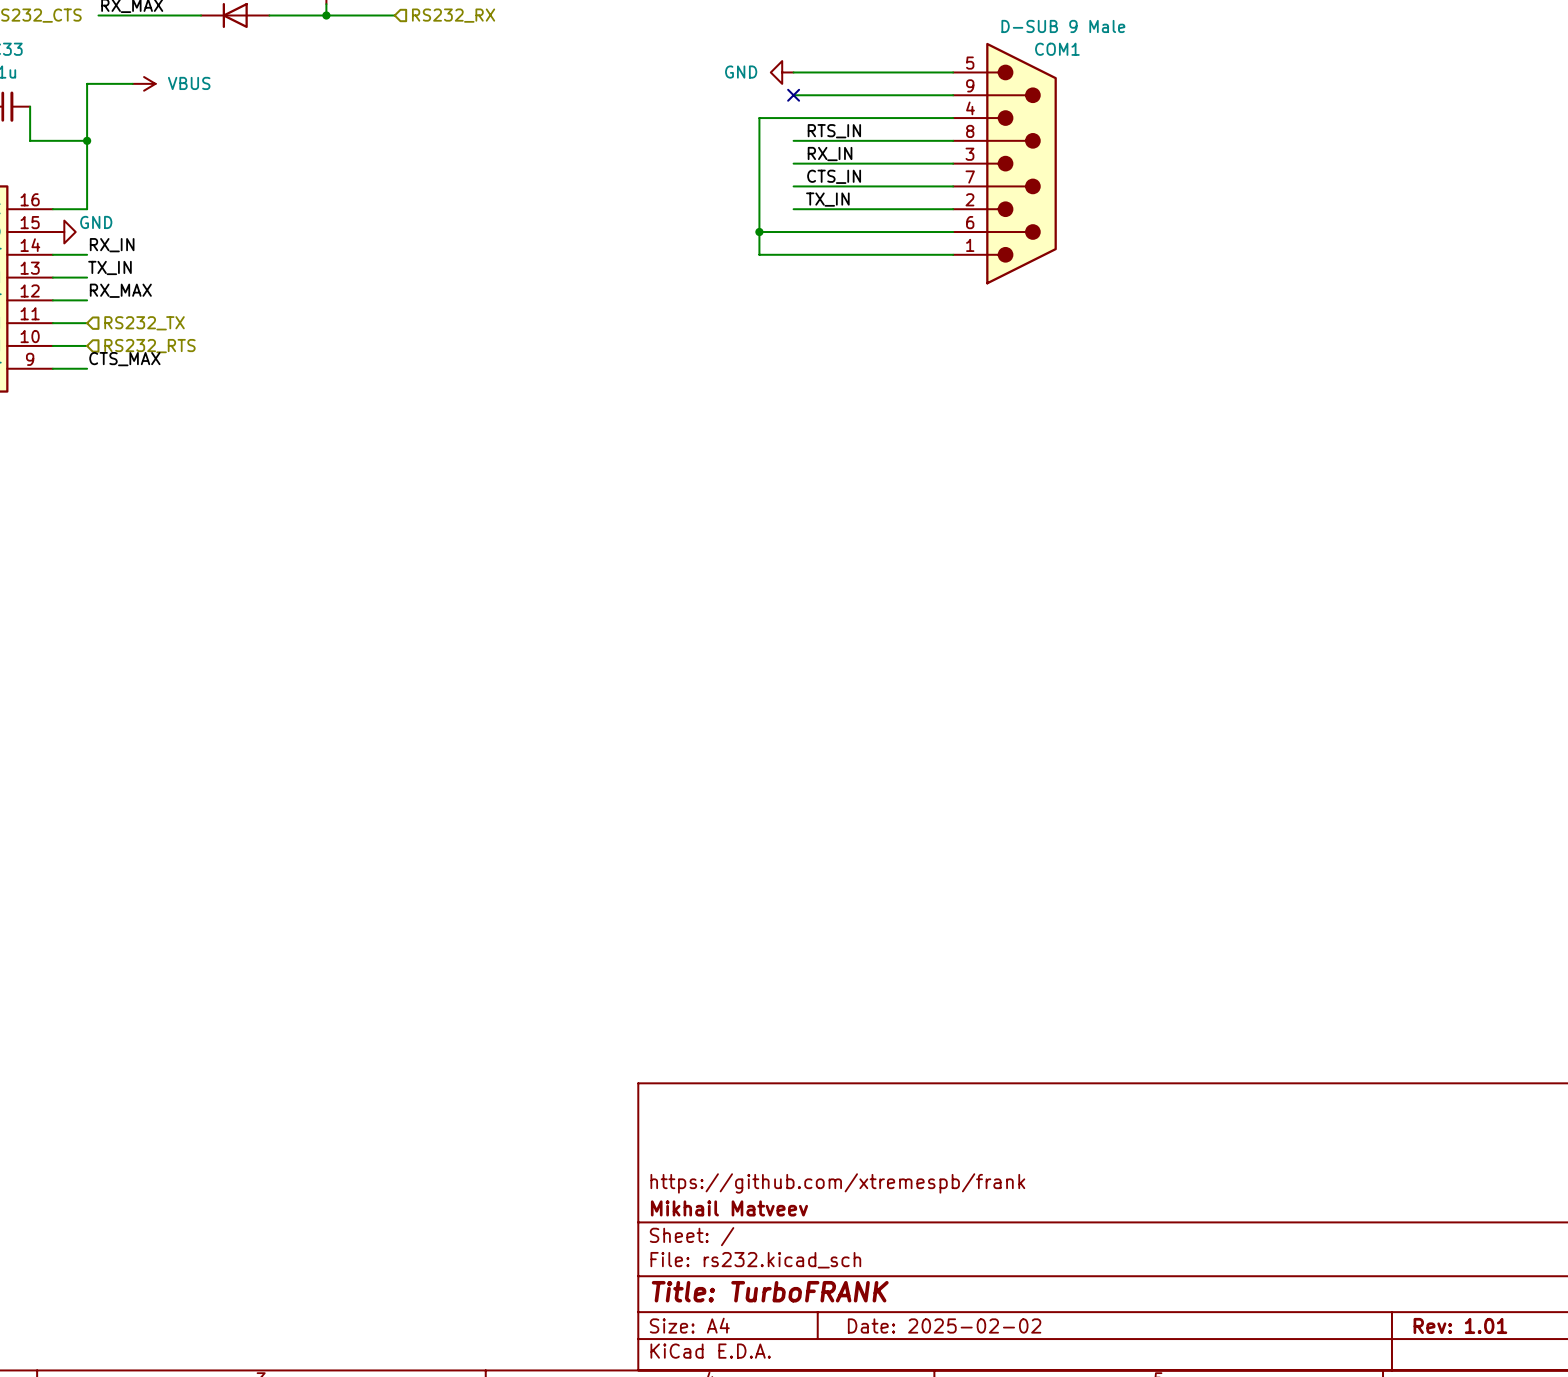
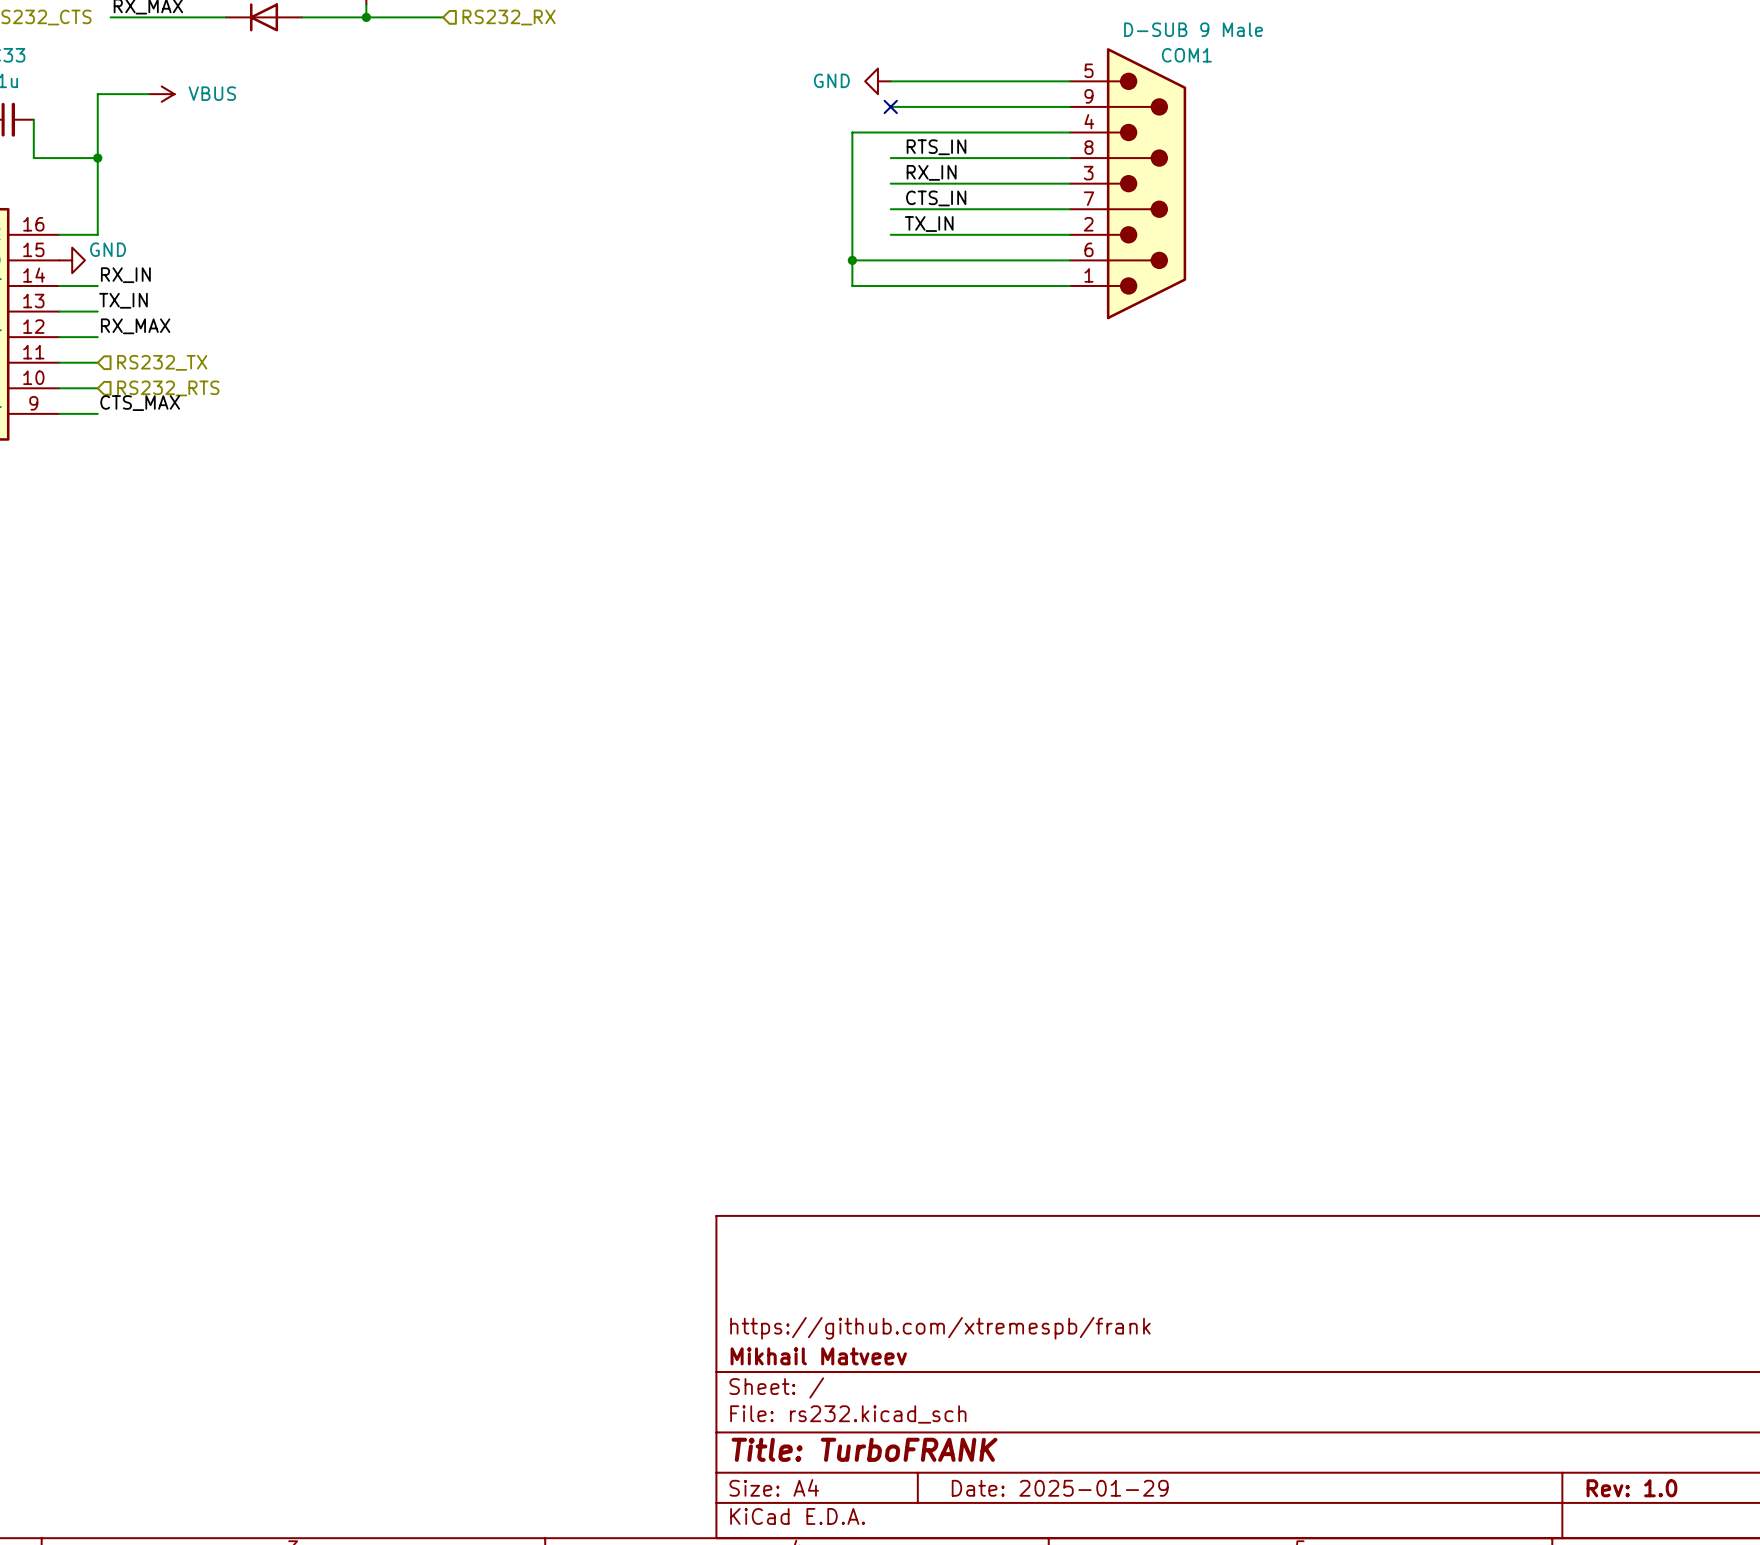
title block: Date: 2025-02-02 (944, 1325) -> Date: 2025-01-29 (1060, 1488)
title block: Rev: 1.01 (1460, 1325) -> Rev: 1.0 (1631, 1488)

